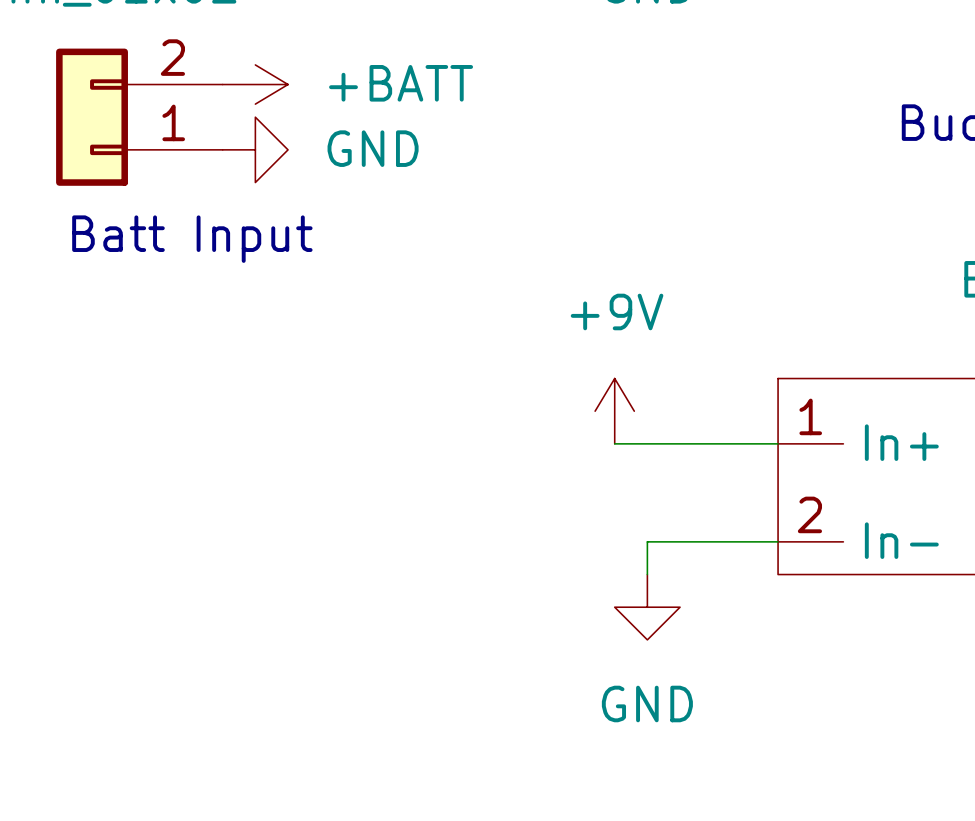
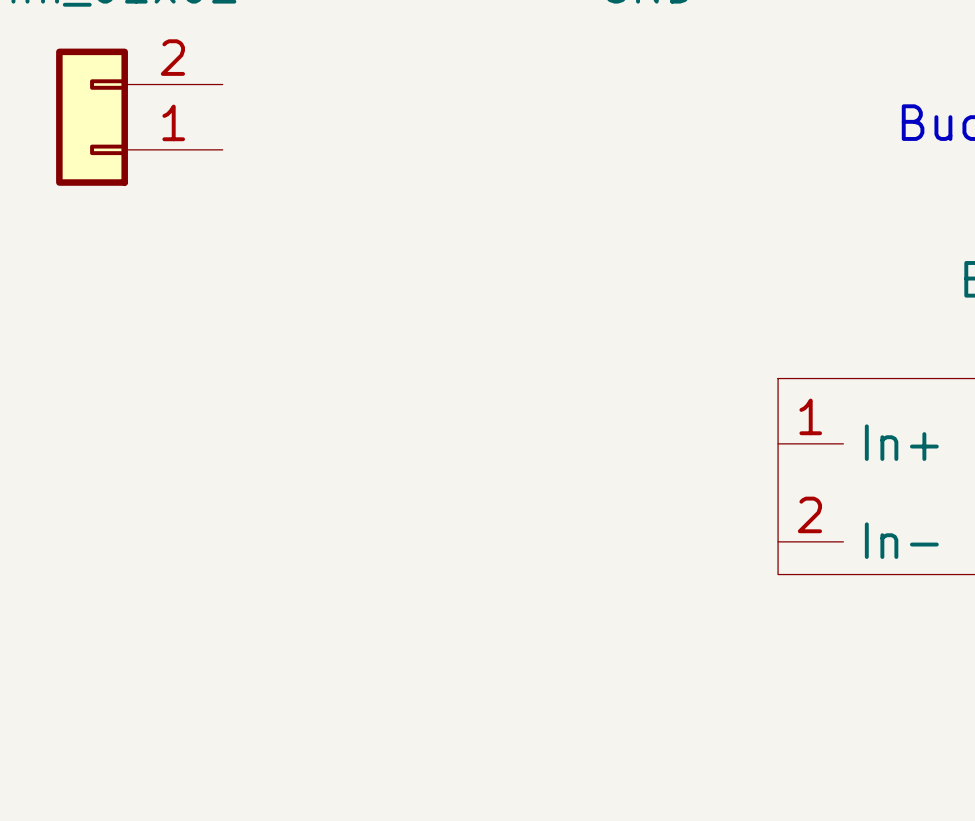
power symbol: +BATT (255, 84) -> none
power symbol: GND (255, 149) -> none
text: Batt Input (192, 239) -> none
power symbol: +9V (614, 411) -> none
wire: (614, 443) (778, 443) -> none
wire: (778, 541) (647, 541) (647, 574) -> none
power symbol: GND (647, 607) -> none

